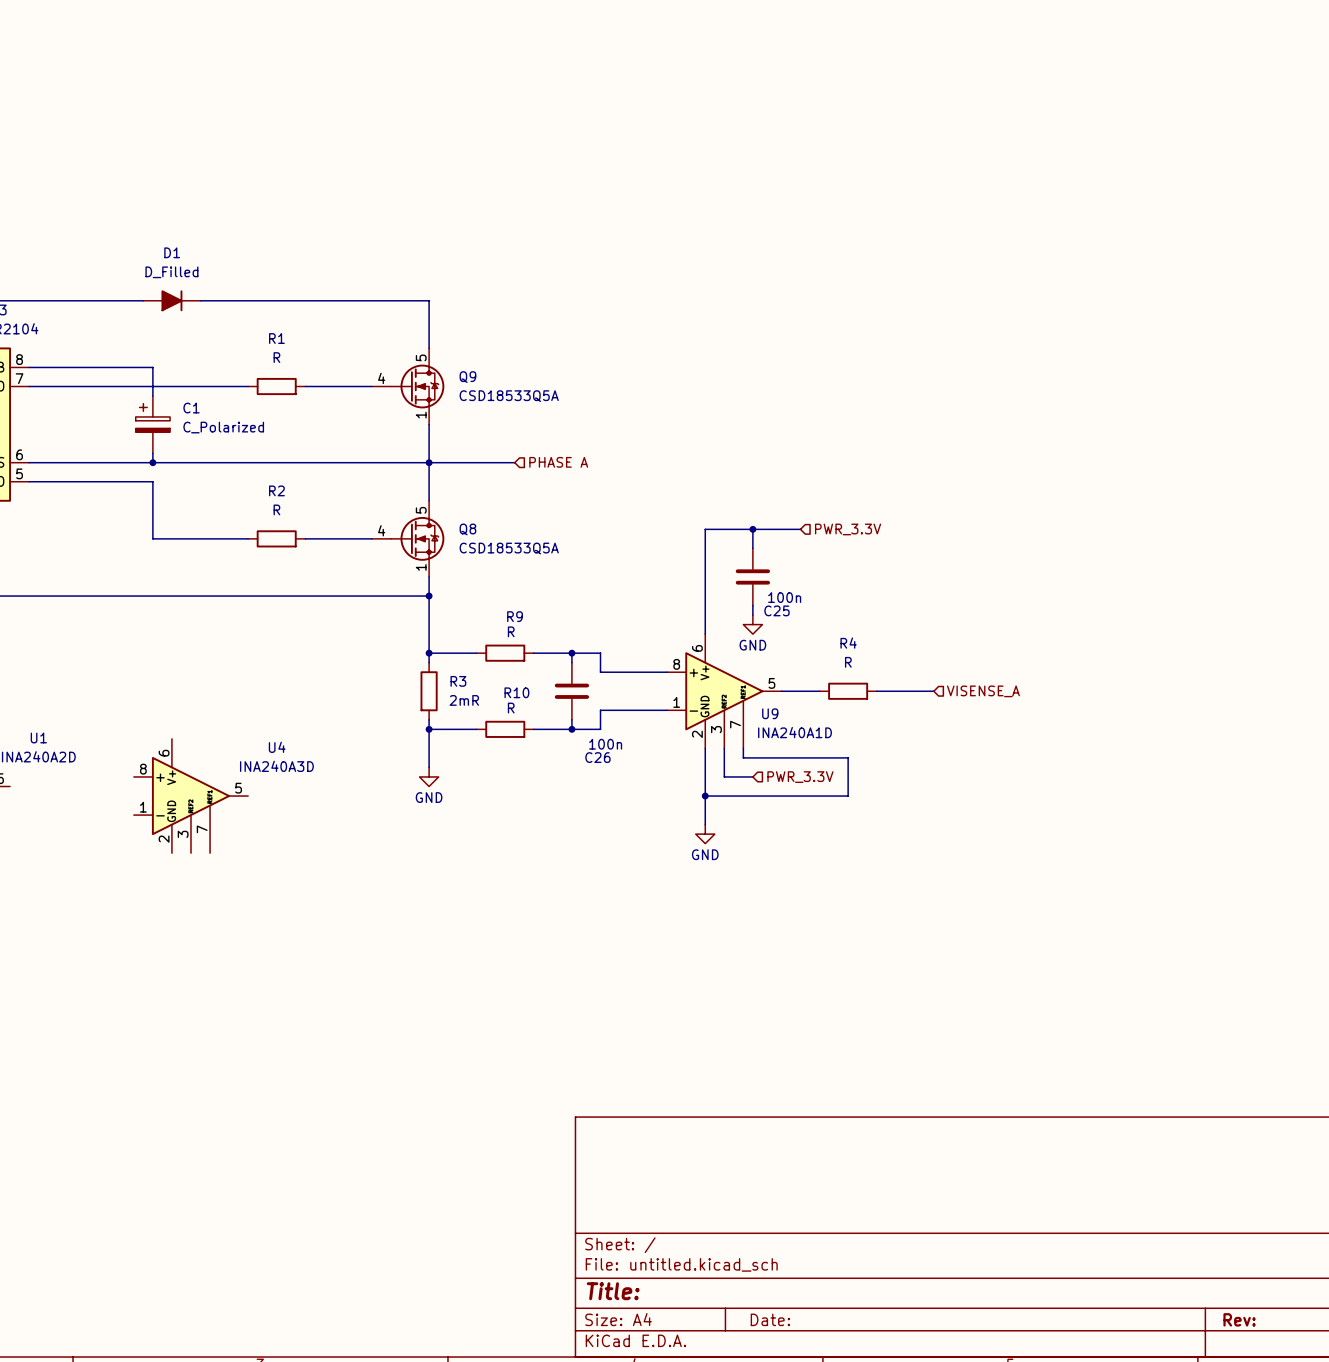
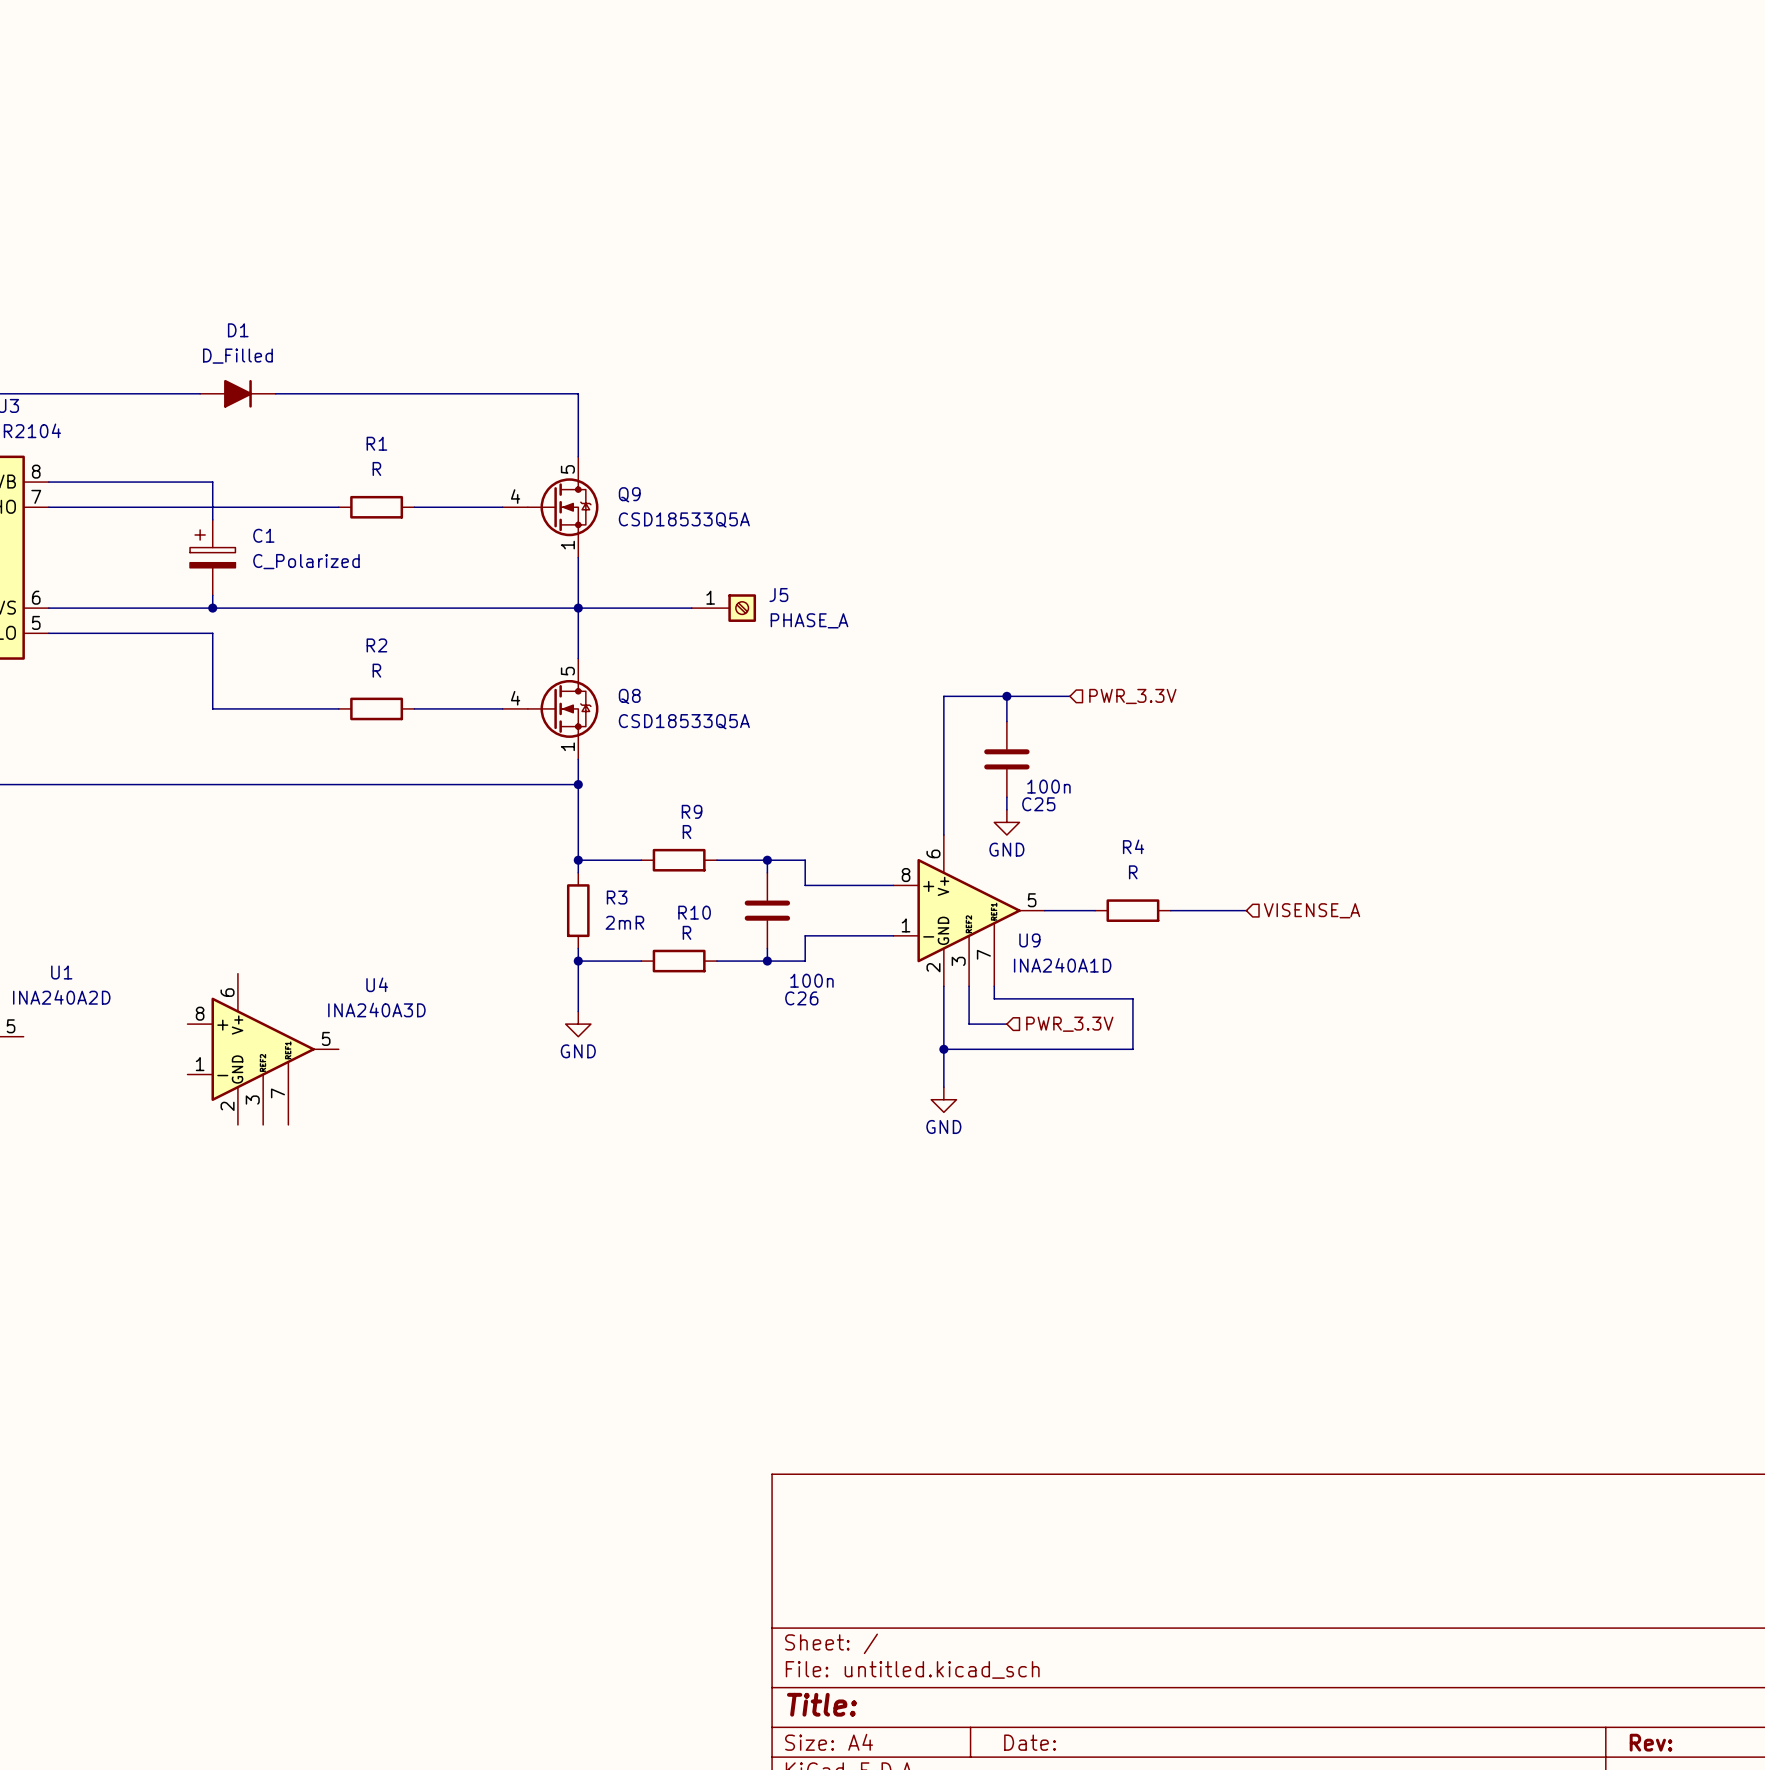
J5: none -> PHASE_A (723, 608)
hierarchical label: PHASE A (558, 462) -> none

